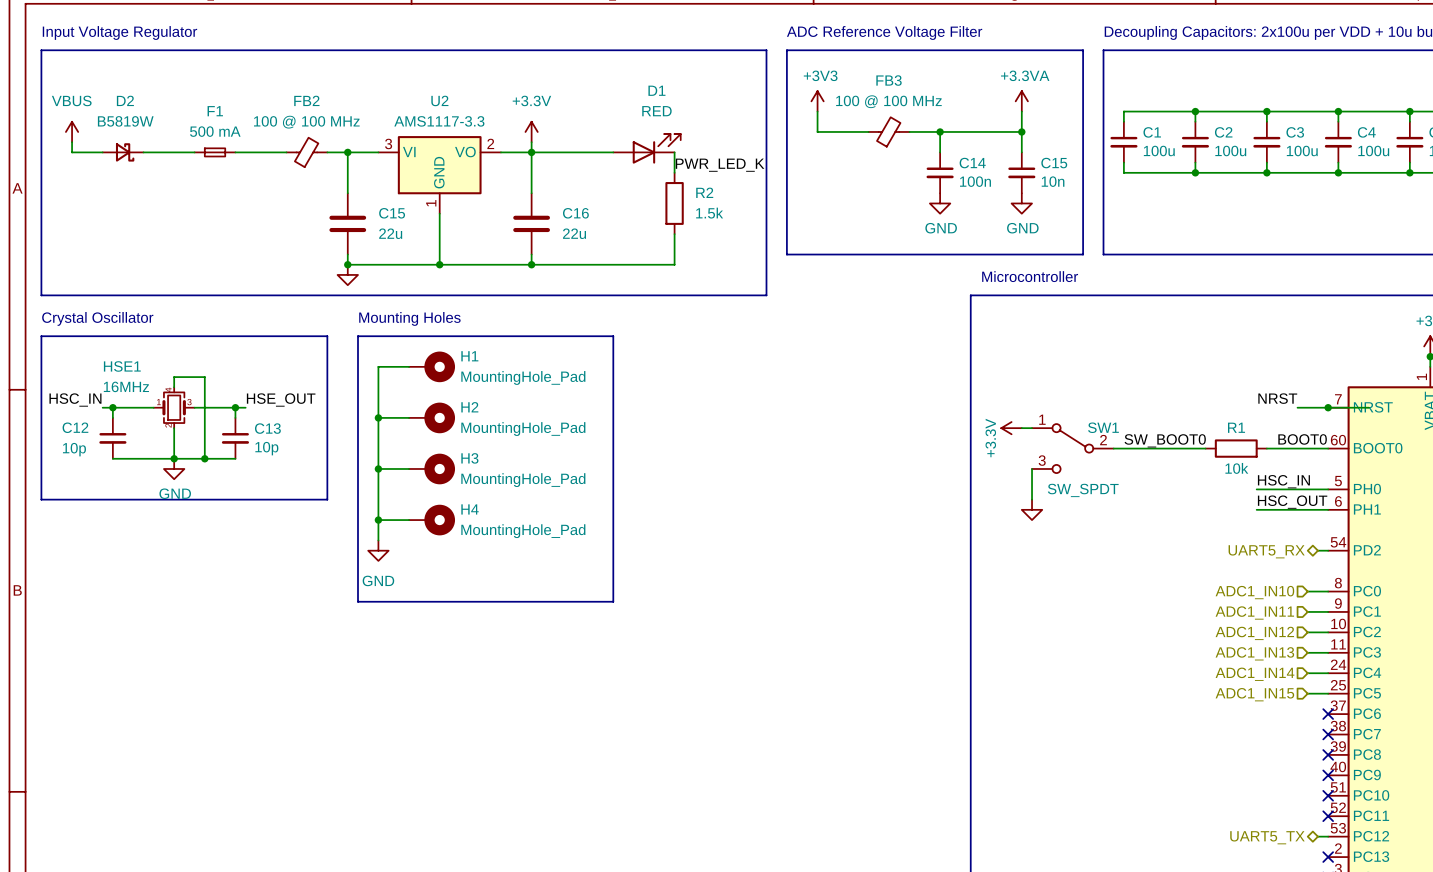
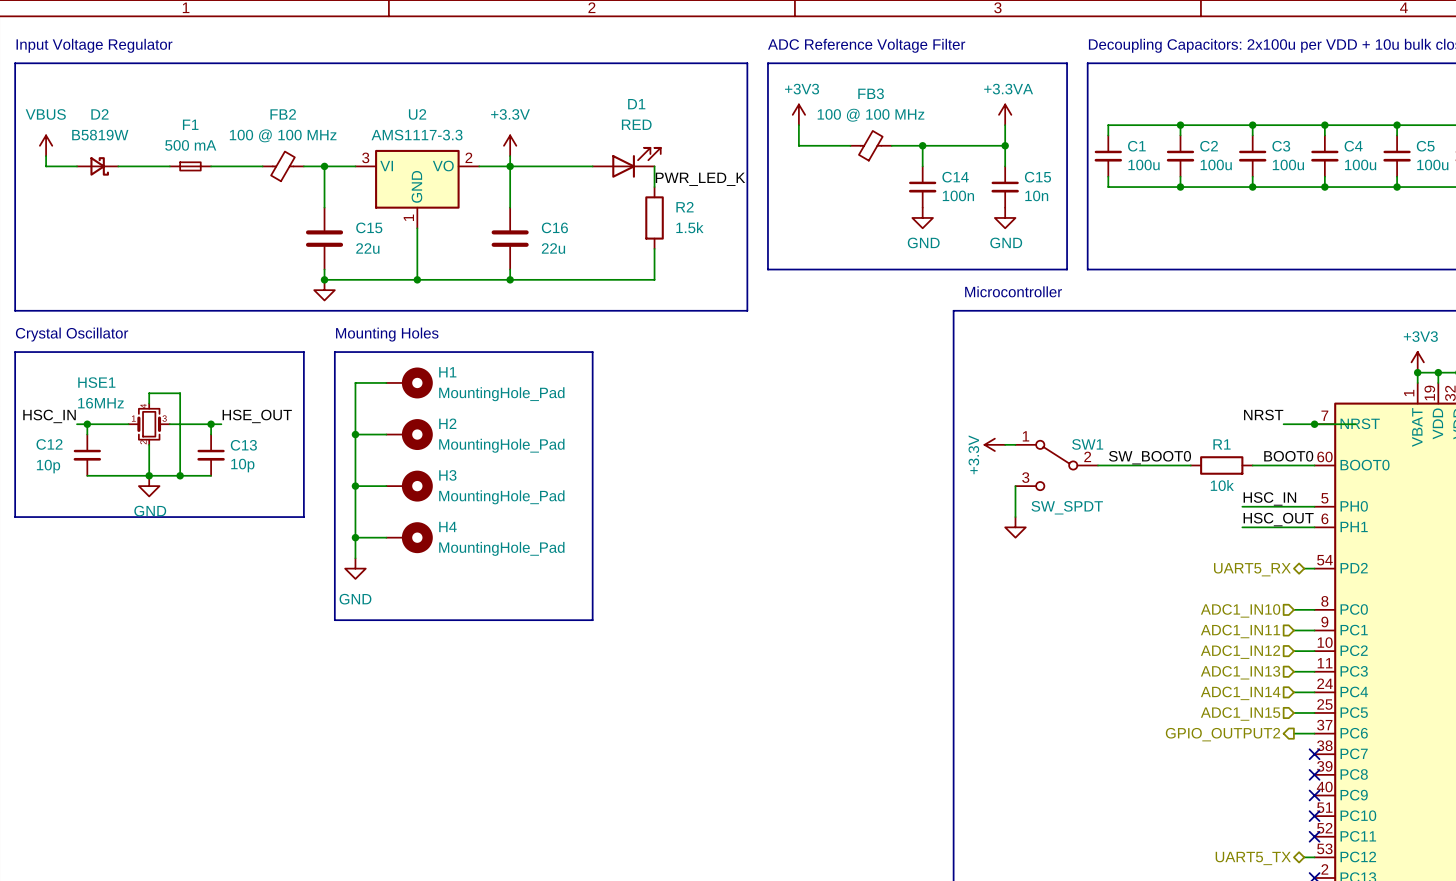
wire: none -> (1293, 733) (1314, 733)
no-connect mark: (1328, 714) -> none
hierarchical label: none -> GPIO_OUTPUT2 (1222, 734)

